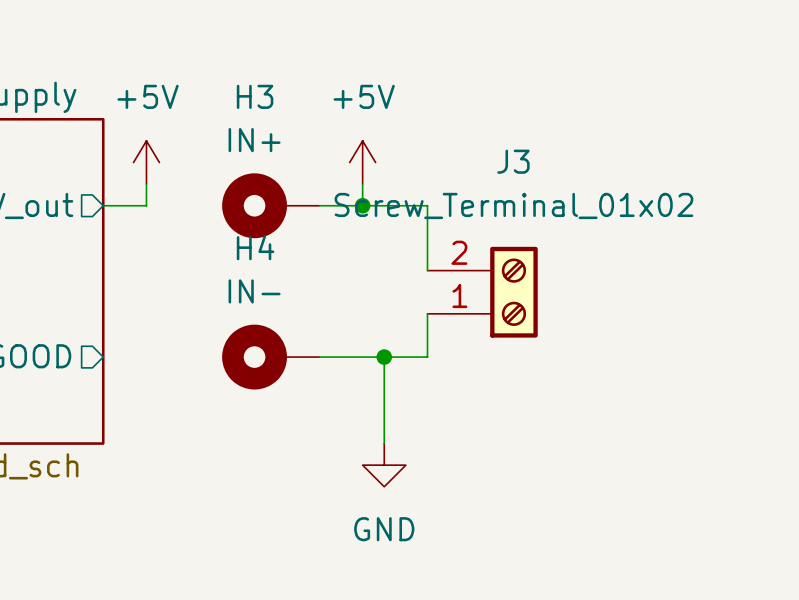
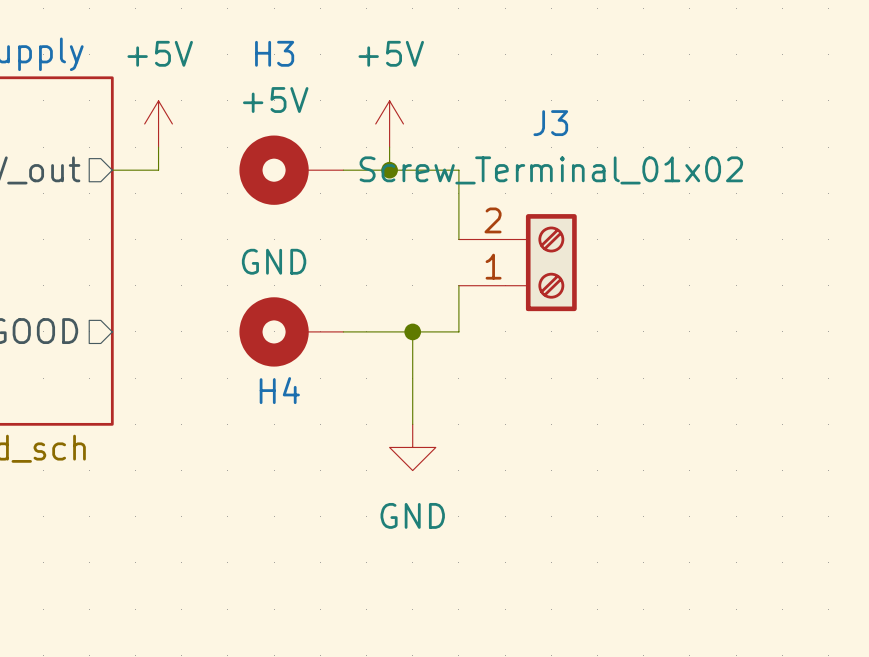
H3 value: IN+ (254, 140) -> +5V (275, 100)
H4 name position: H4 (255, 247) -> H4 (279, 390)
H4 value: IN- (254, 291) -> GND (274, 261)

